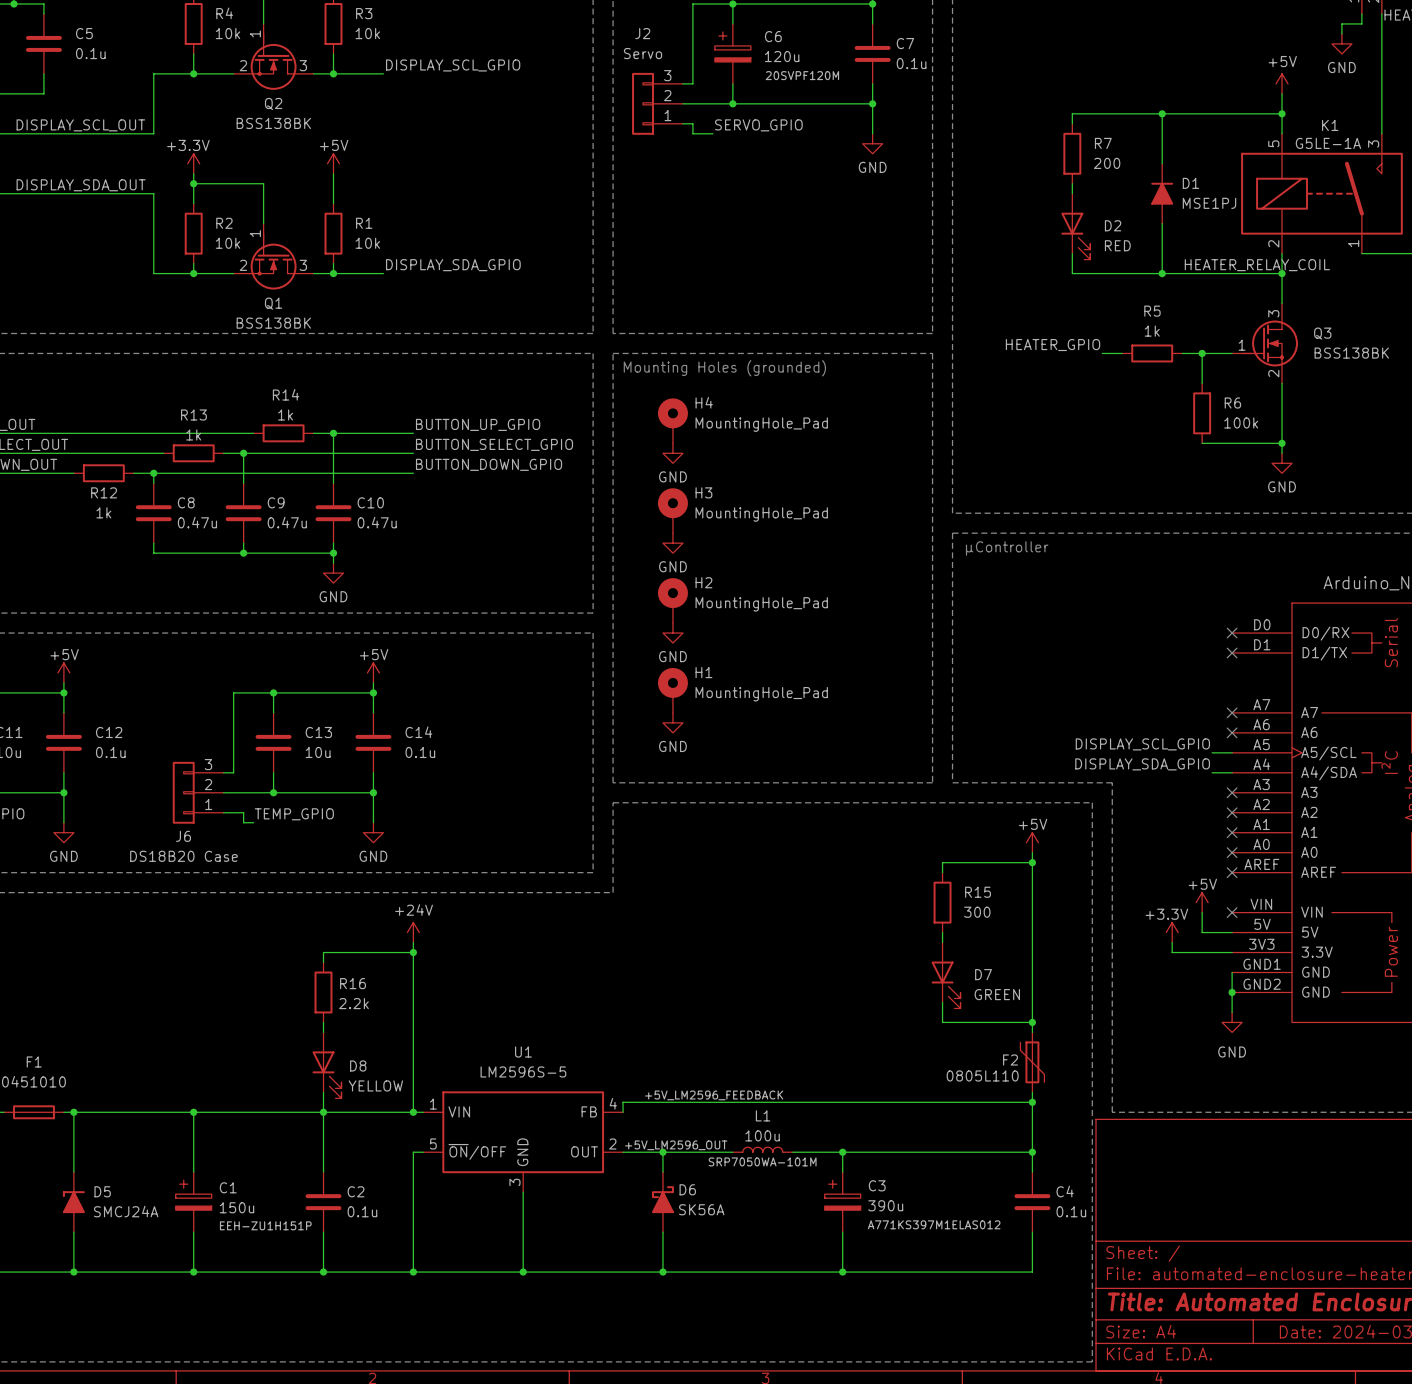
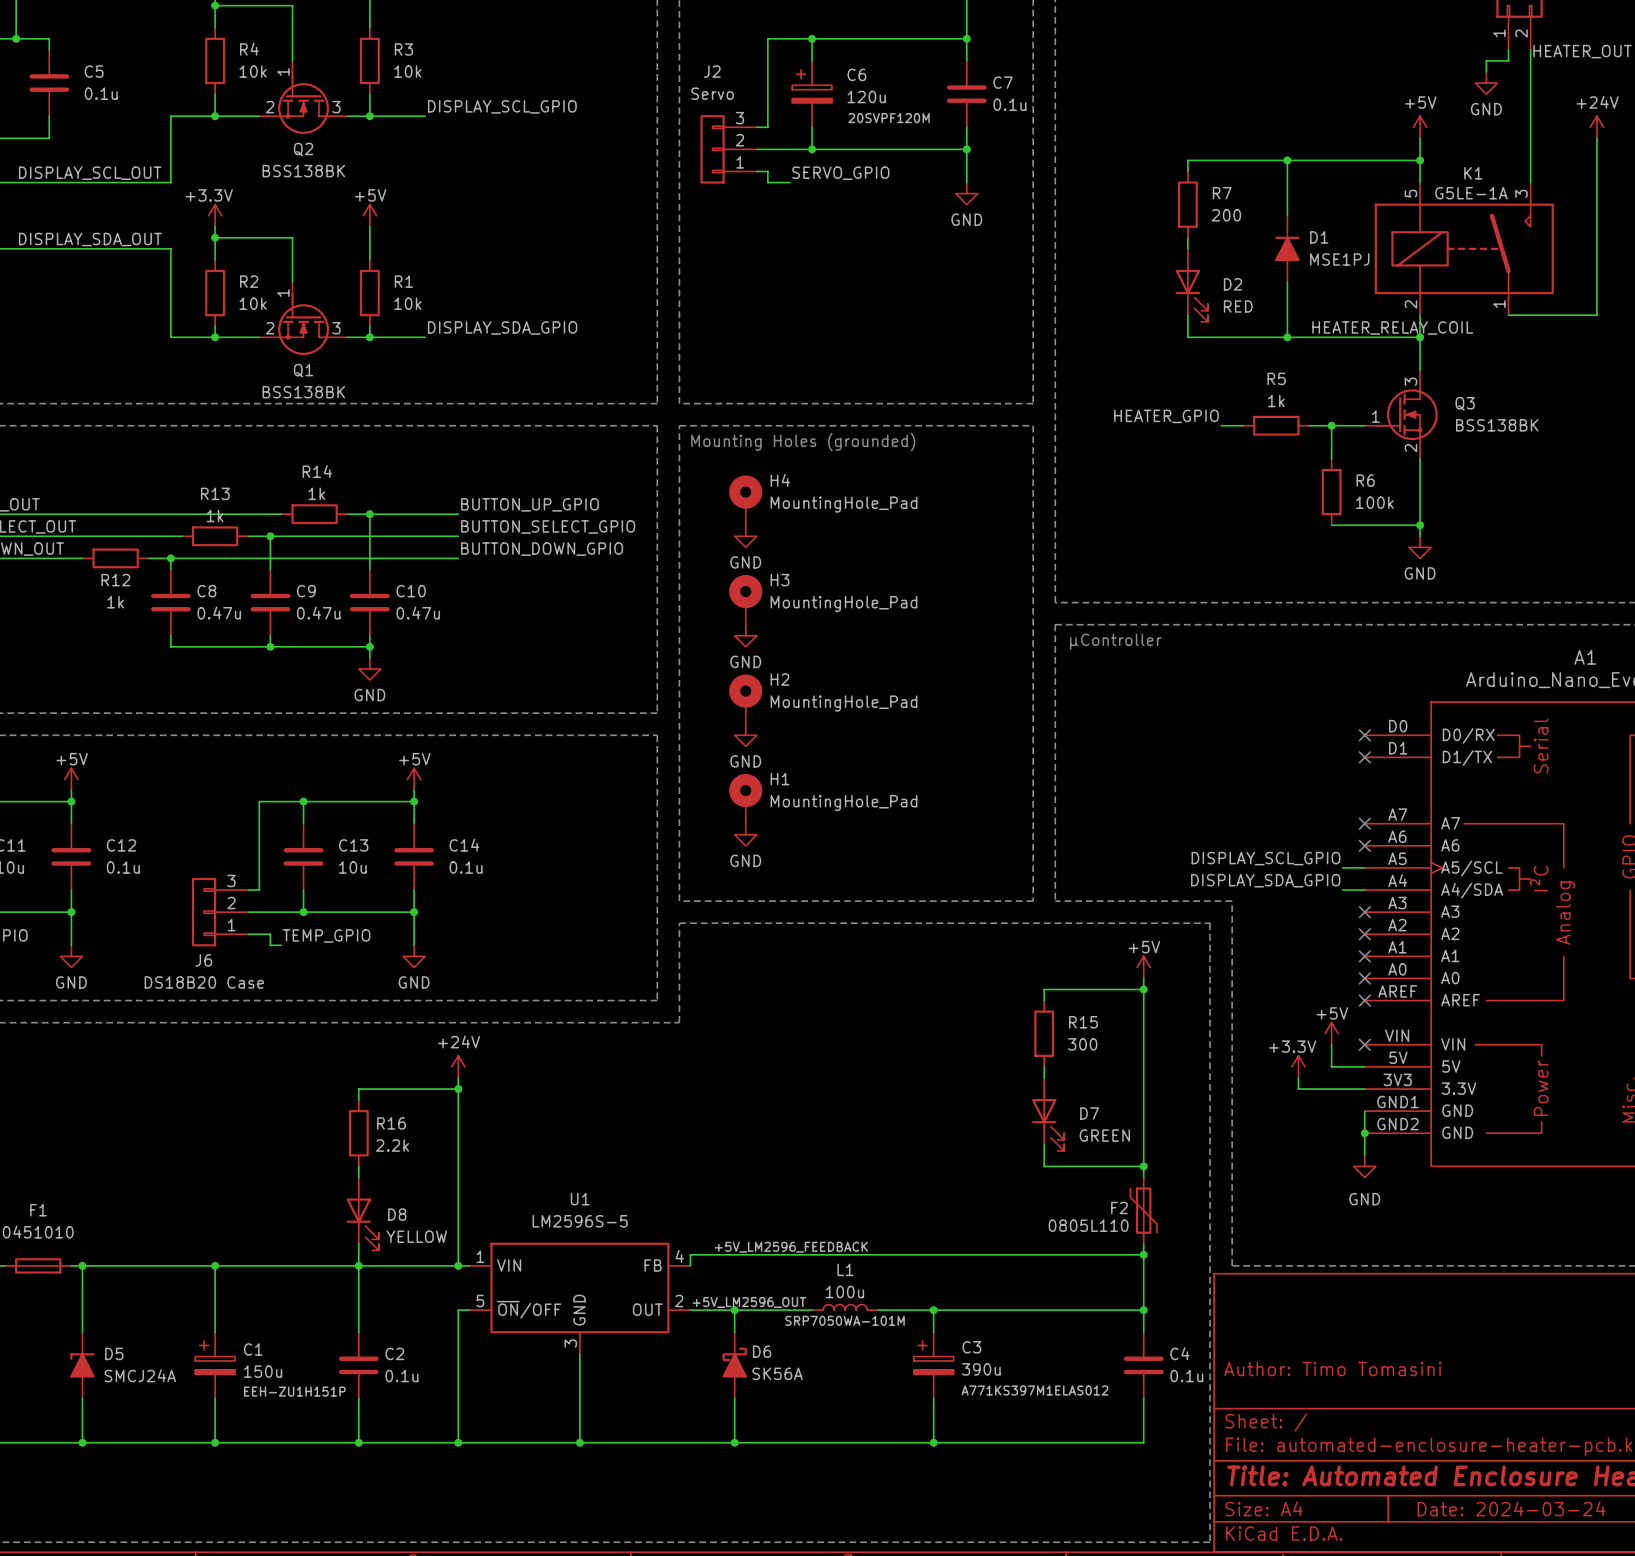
title block: none -> Author: Timo Tomasini (1332, 1368)

